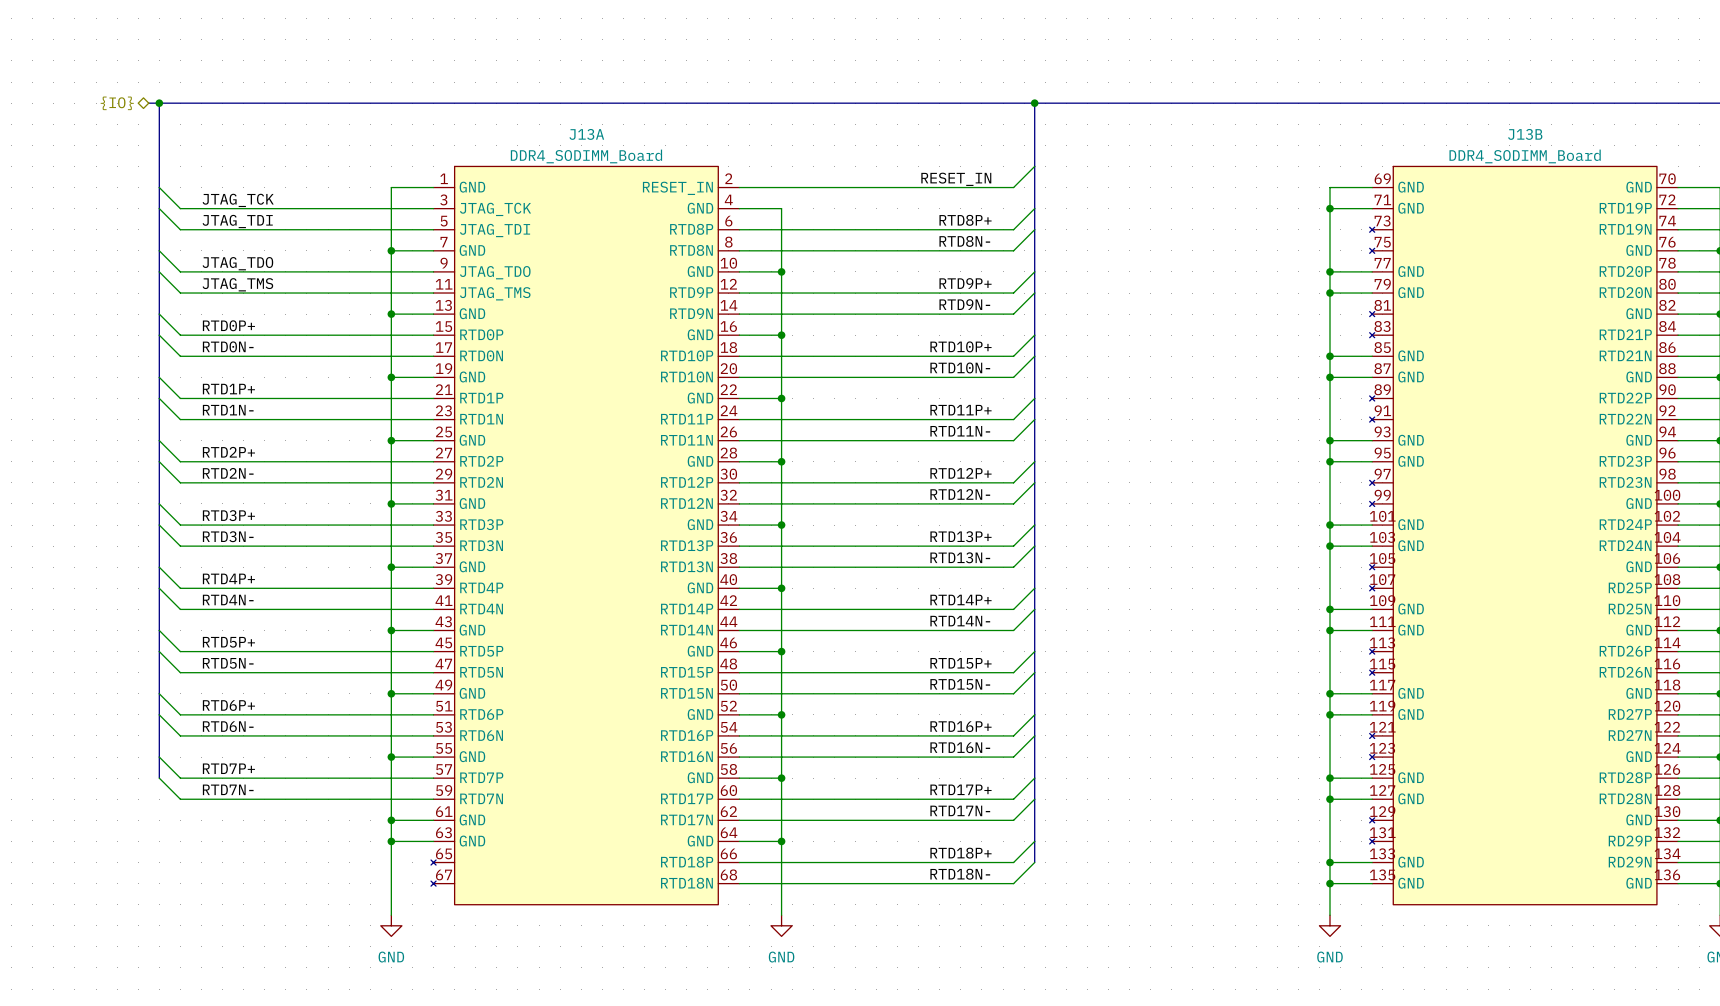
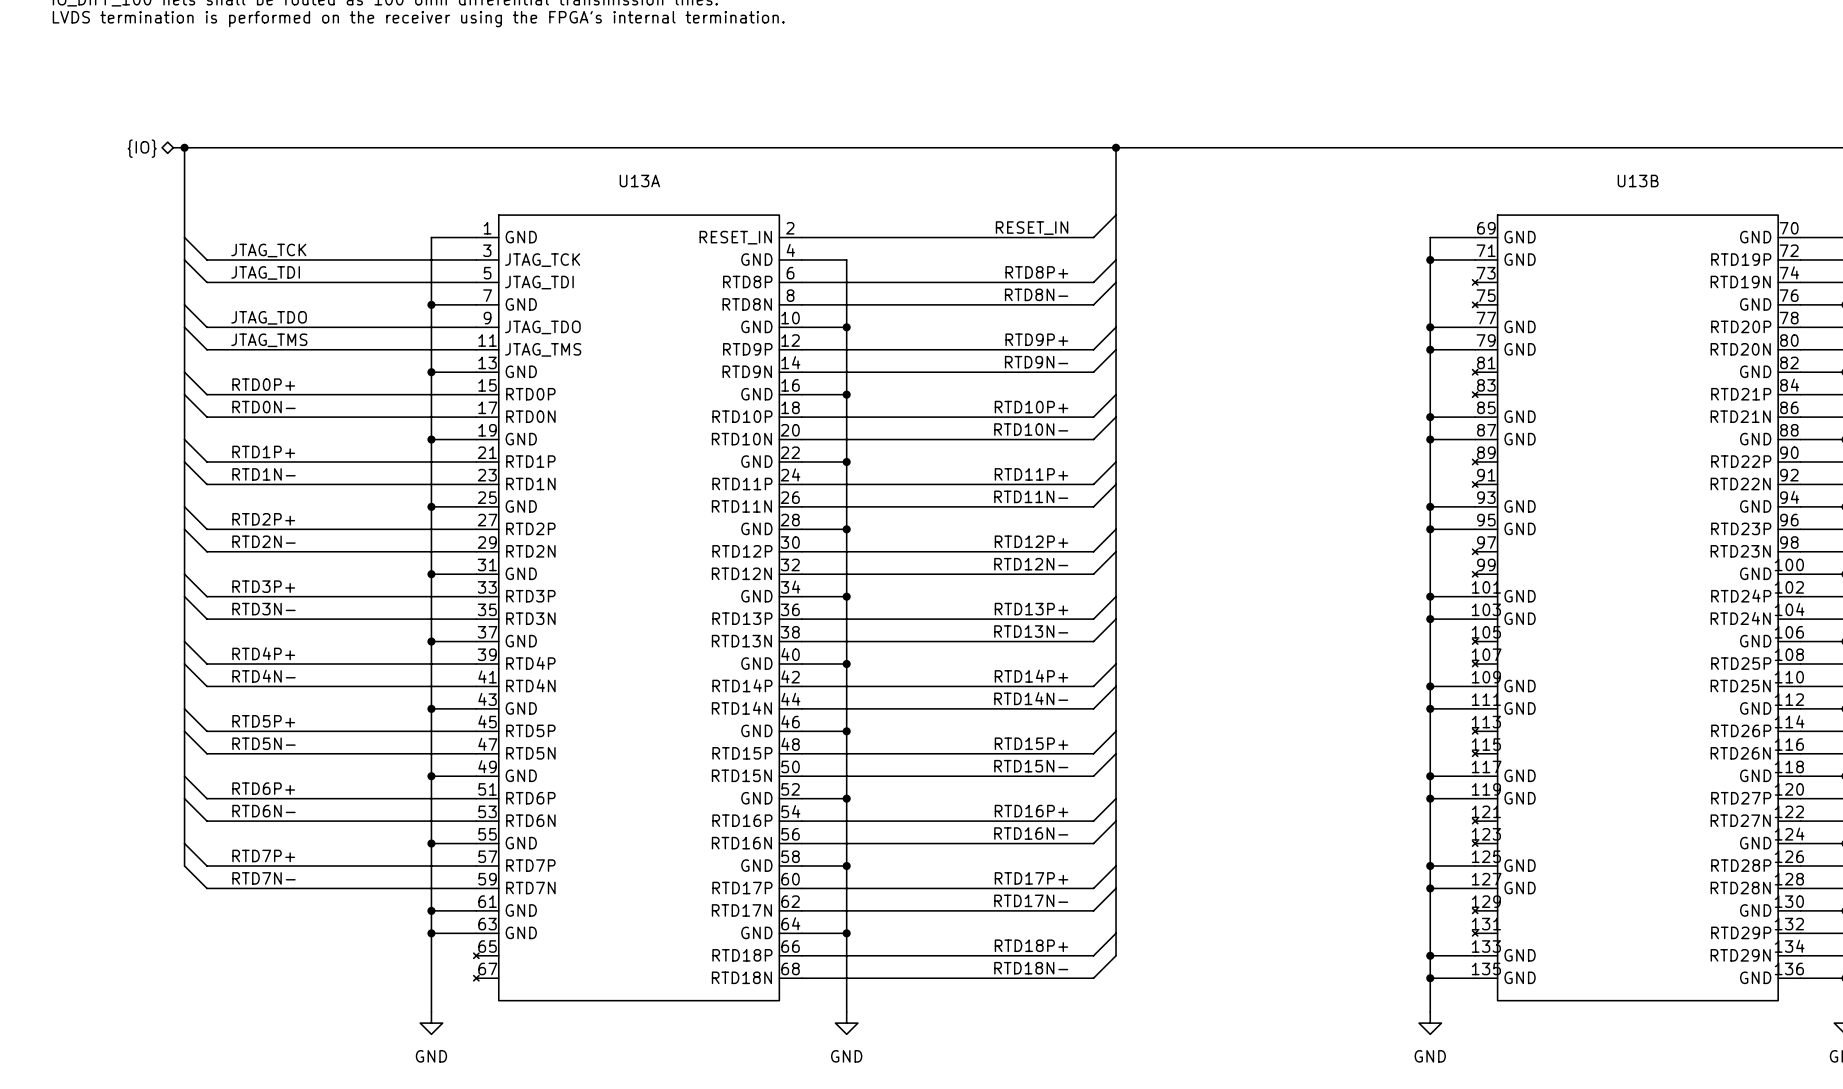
J13A name: J13A (586, 134) -> U13A (639, 181)
J13B name: J13B (1525, 134) -> U13B (1638, 181)
J13A value: DDR4_SODIMM_Board (586, 156) -> none
J13B value: DDR4_SODIMM_Board (1525, 156) -> none
J13B pin name: RD25P (1630, 587) -> RTD25P (1741, 663)
J13B pin name: RD25N (1630, 609) -> RTD25N (1740, 686)
J13B pin name: RD27P (1630, 714) -> RTD27P (1741, 798)
J13B pin name: RD27N (1630, 735) -> RTD27N (1740, 820)
J13B pin name: RD29P (1630, 840) -> RTD29P (1741, 932)
J13B pin name: RD29N (1630, 862) -> RTD29N (1740, 955)

